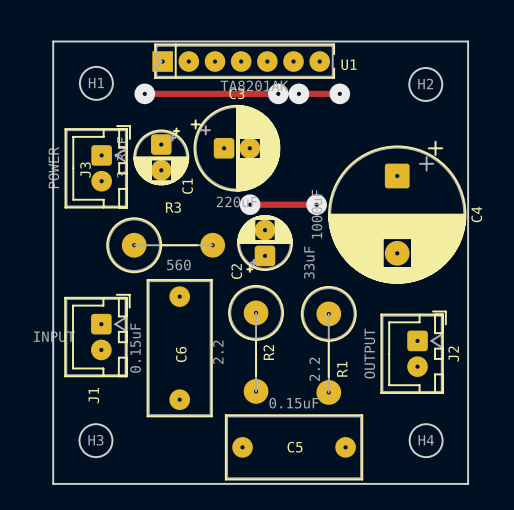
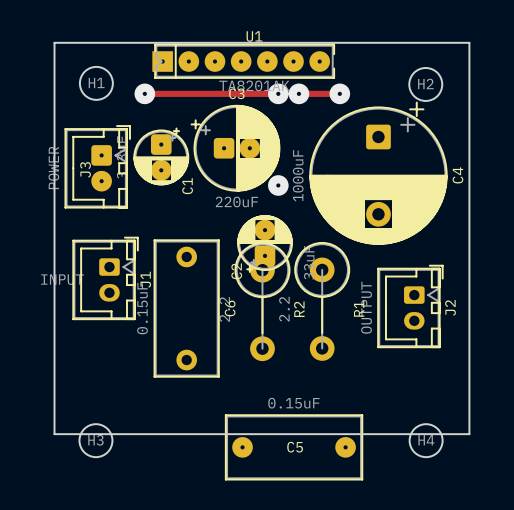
board edge: (53, 41) (468, 41) (468, 483) (53, 483) (53, 41) -> (54, 42) (54, 434) (469, 434) (469, 42) (54, 42)
U1 name position: U1 (349, 64) -> U1 (254, 36)
C4 footprint: [328, 141, 467, 284] -> [309, 102, 448, 245]
via: none -> (278, 185)
track: (250, 204) (316, 204) -> none
via: (250, 204) -> none
via: (316, 204) -> none
R3: 560 (165, 245) -> none
C6 footprint: [146, 279, 213, 417] -> [153, 239, 220, 378]
R2 footprint: [228, 285, 284, 404] -> [234, 242, 291, 362]
R1 footprint: [301, 286, 357, 405] -> [294, 242, 350, 361]
J1 footprint: [64, 294, 131, 377] -> [72, 237, 139, 320]
J2 footprint: [380, 310, 447, 394] -> [377, 265, 444, 348]
R2 name position: R2 (268, 352) -> R2 (299, 309)
C6 name position: C6 (181, 354) -> C6 (230, 308)
R1 value position: 2.2 (314, 369) -> 2.2 (284, 309)
R1 name position: R1 (342, 369) -> R1 (359, 308)
J1 name position: J1 (93, 395) -> J1 (145, 279)

